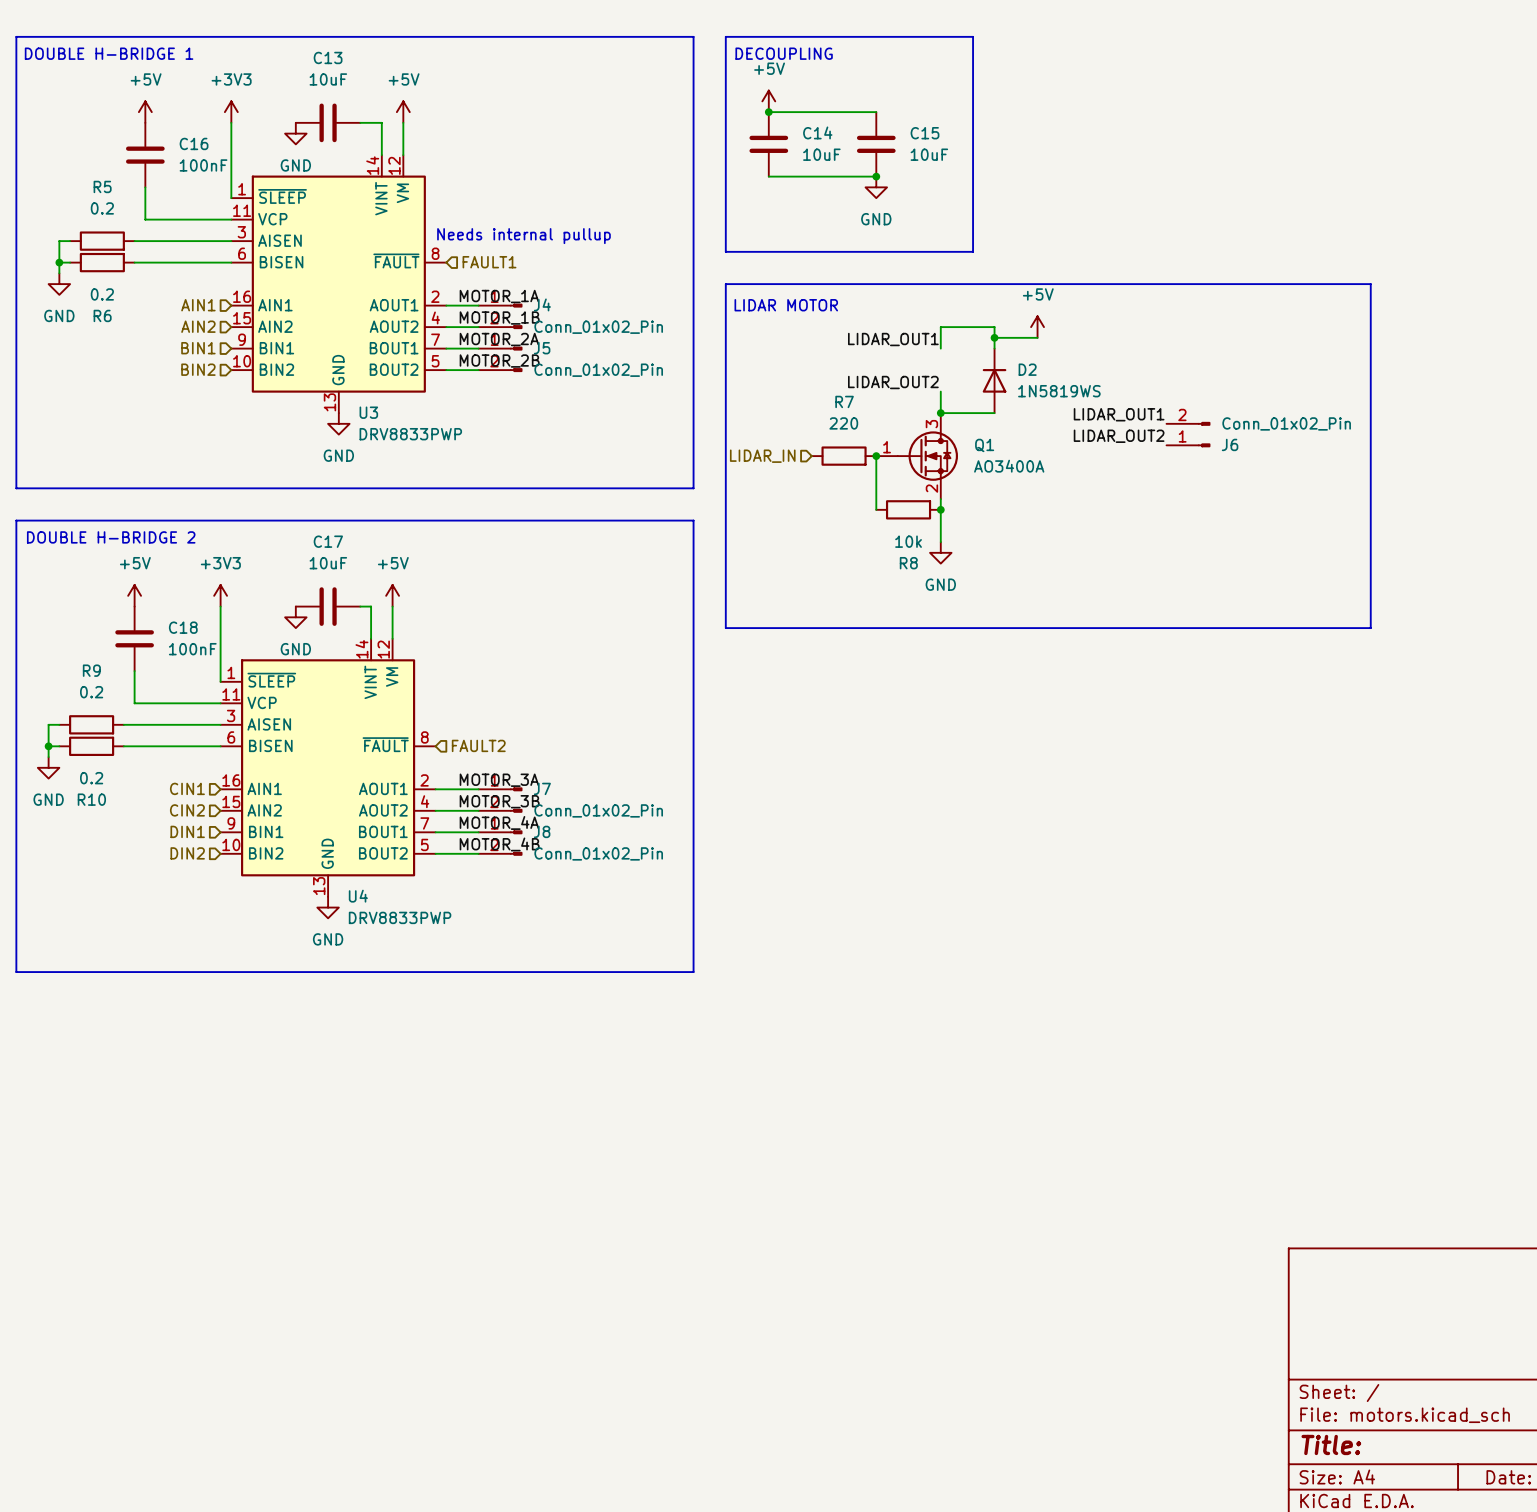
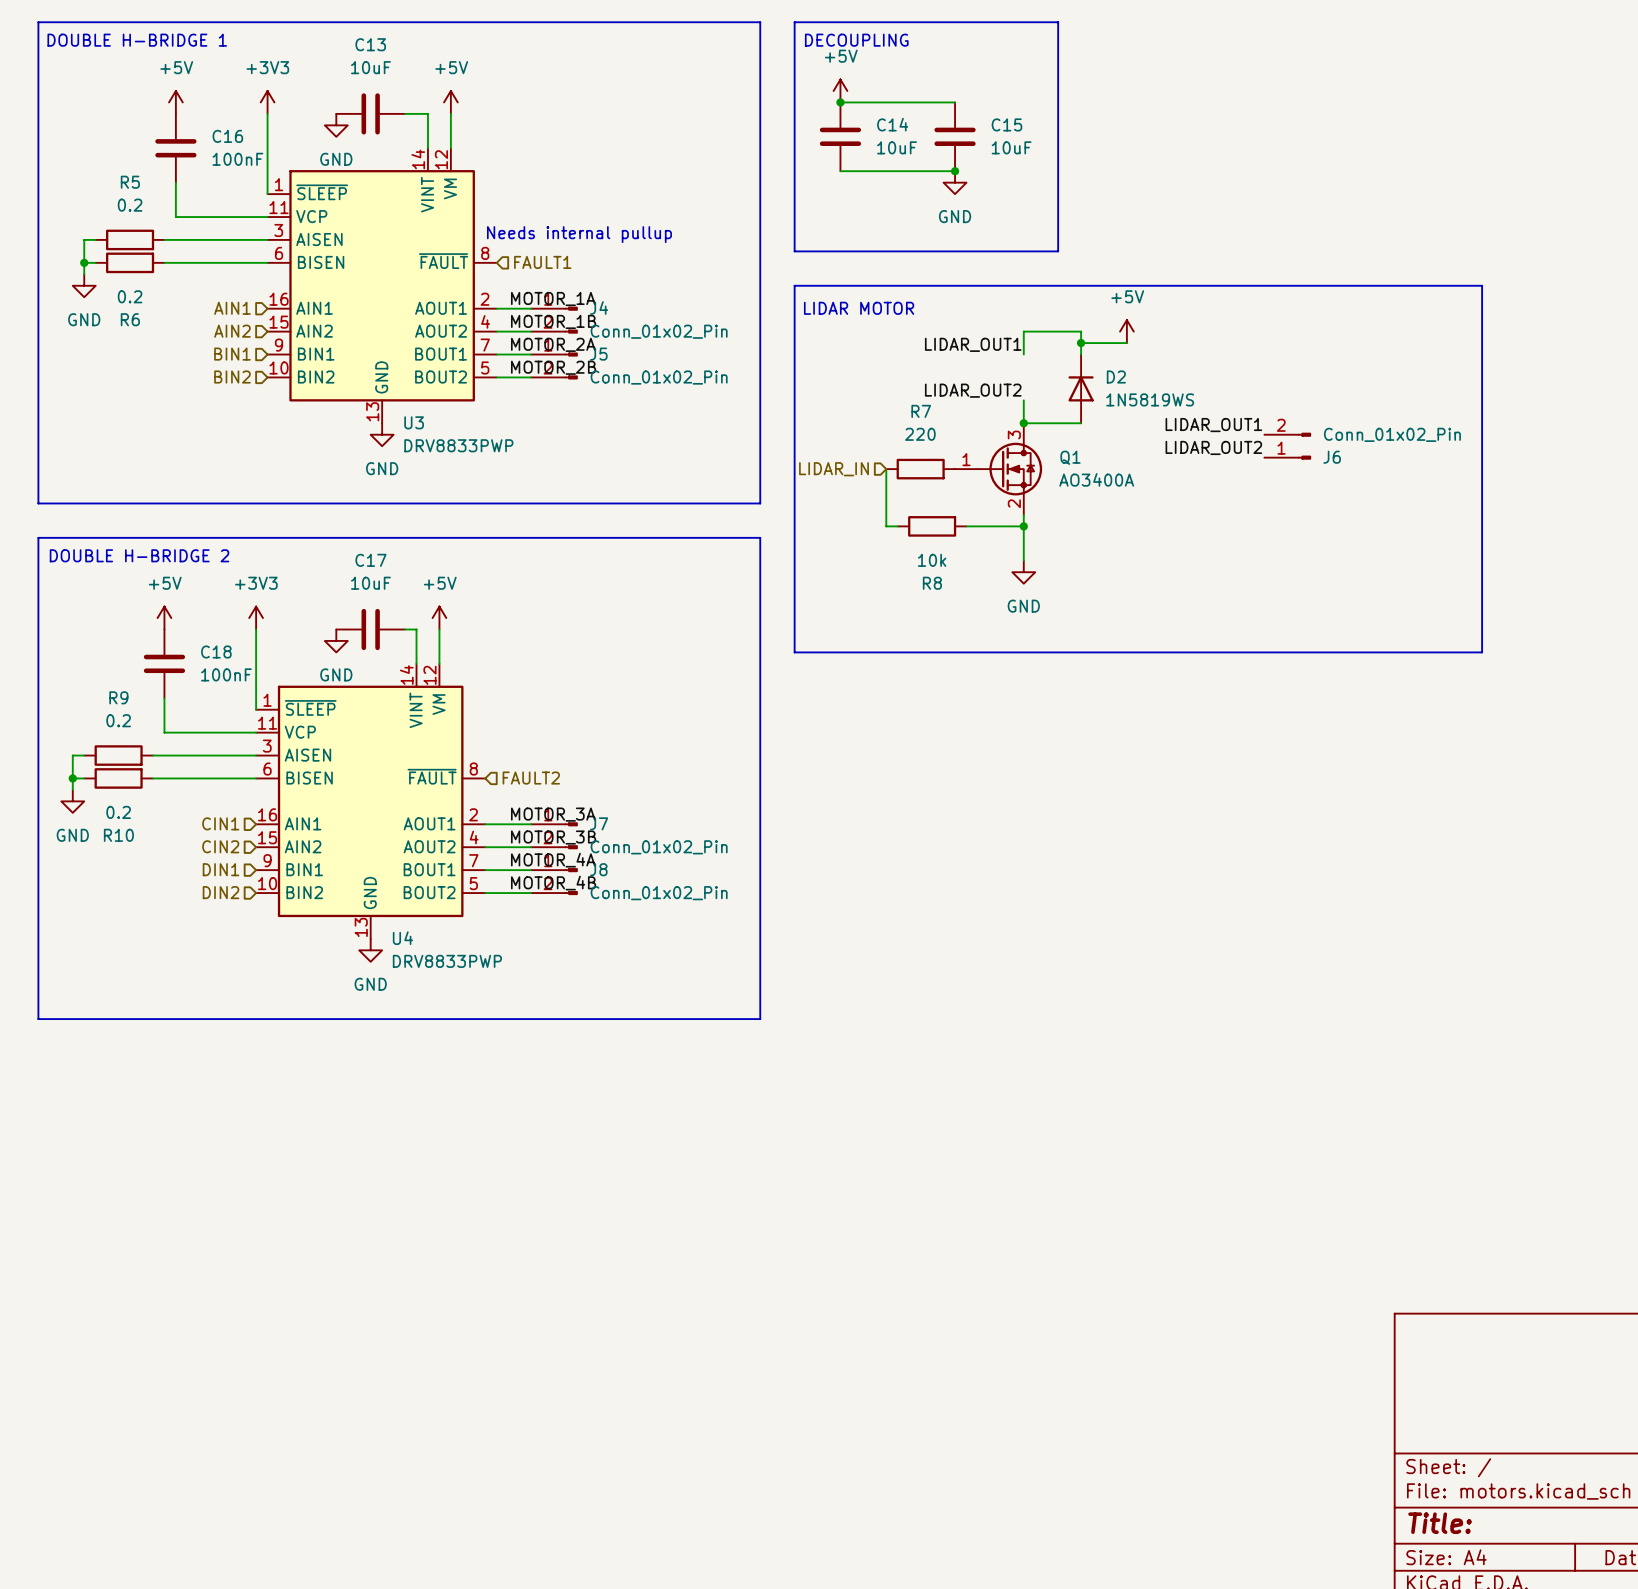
wire: none -> (886, 469) (886, 526) (897, 526)
wire: (876, 456) (876, 509) -> none
junction: (876, 456) -> none
wire: none -> (966, 526) (1023, 526)
R8 position: (908, 509) -> (932, 526)

